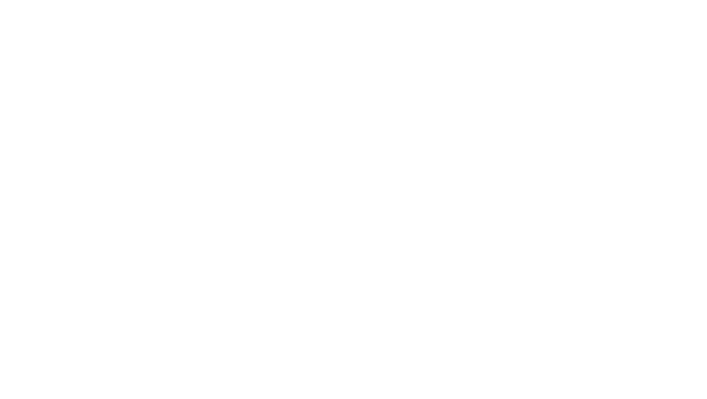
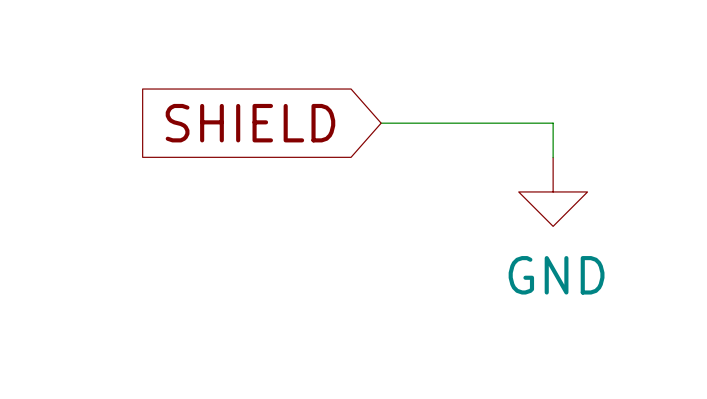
global label: none -> SHIELD (250, 123)
wire: none -> (381, 123) (553, 123) (553, 157)
power symbol: none -> GND (553, 191)

